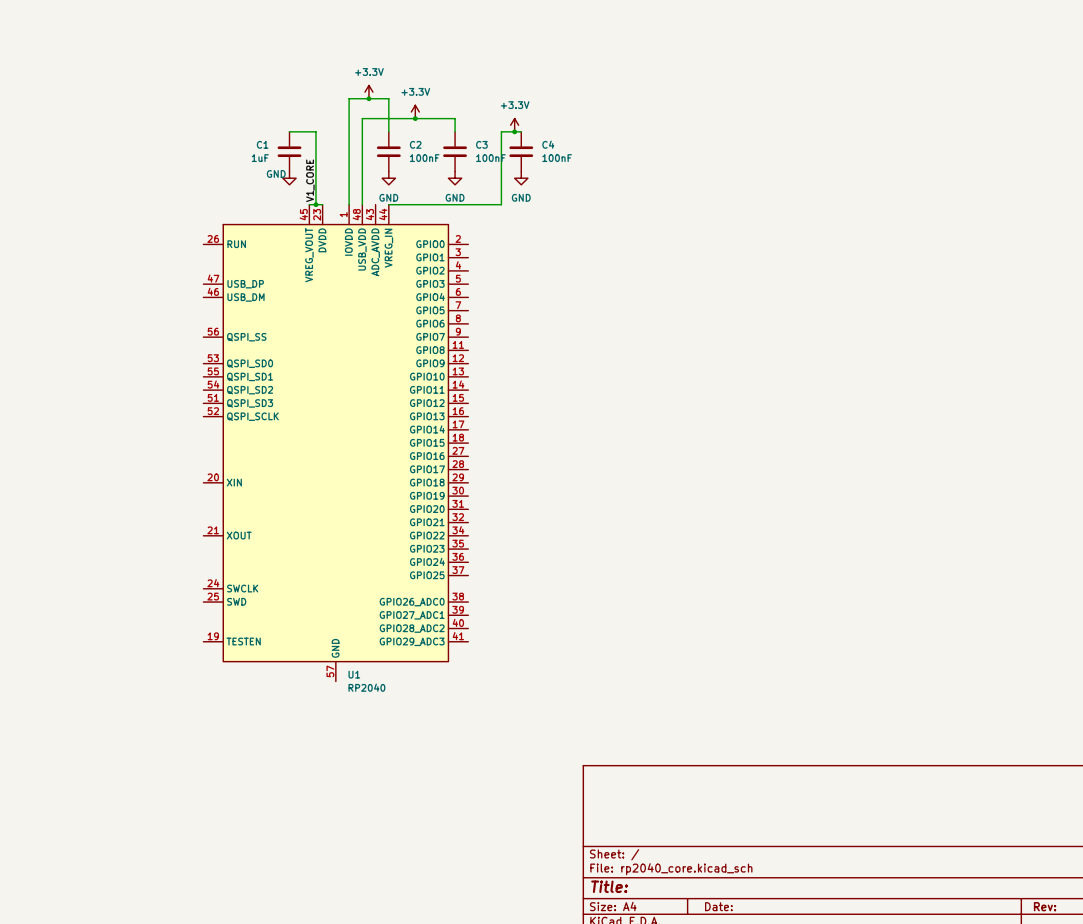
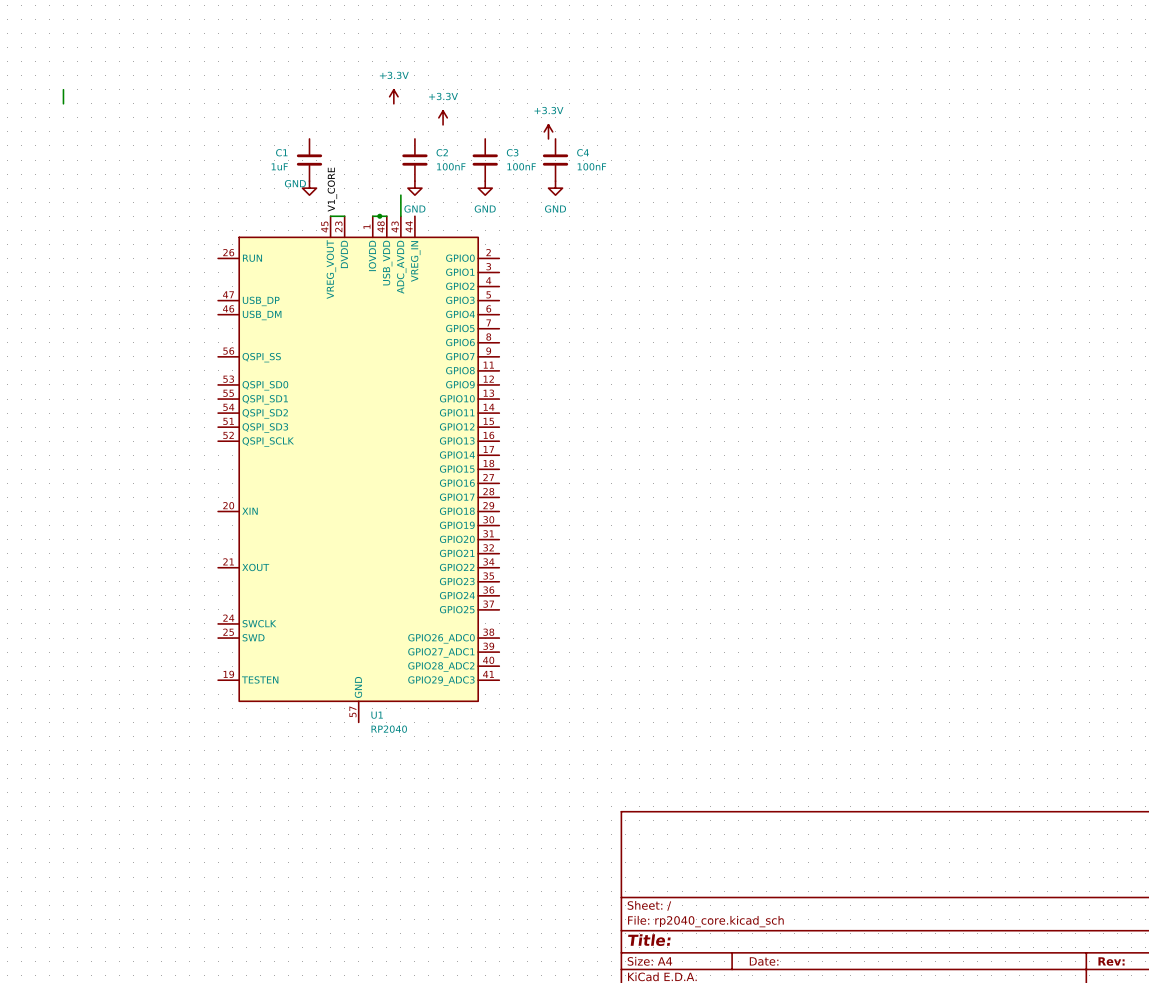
wire: none -> (63, 89) (63, 103)
junction: (368, 98) -> none
junction: (415, 118) -> none
wire: (289, 131) (315, 131) (315, 204) -> none
wire: (388, 131) (388, 98) (349, 98) (349, 204) -> (386, 216) (372, 216)
wire: (455, 131) (455, 118) (362, 118) (362, 204) -> none
junction: (514, 131) -> none
wire: (521, 131) (501, 131) (501, 204) (388, 204) -> none
wire: none -> (400, 195) (400, 216)
junction: (315, 204) -> none
junction: none -> (379, 216)

